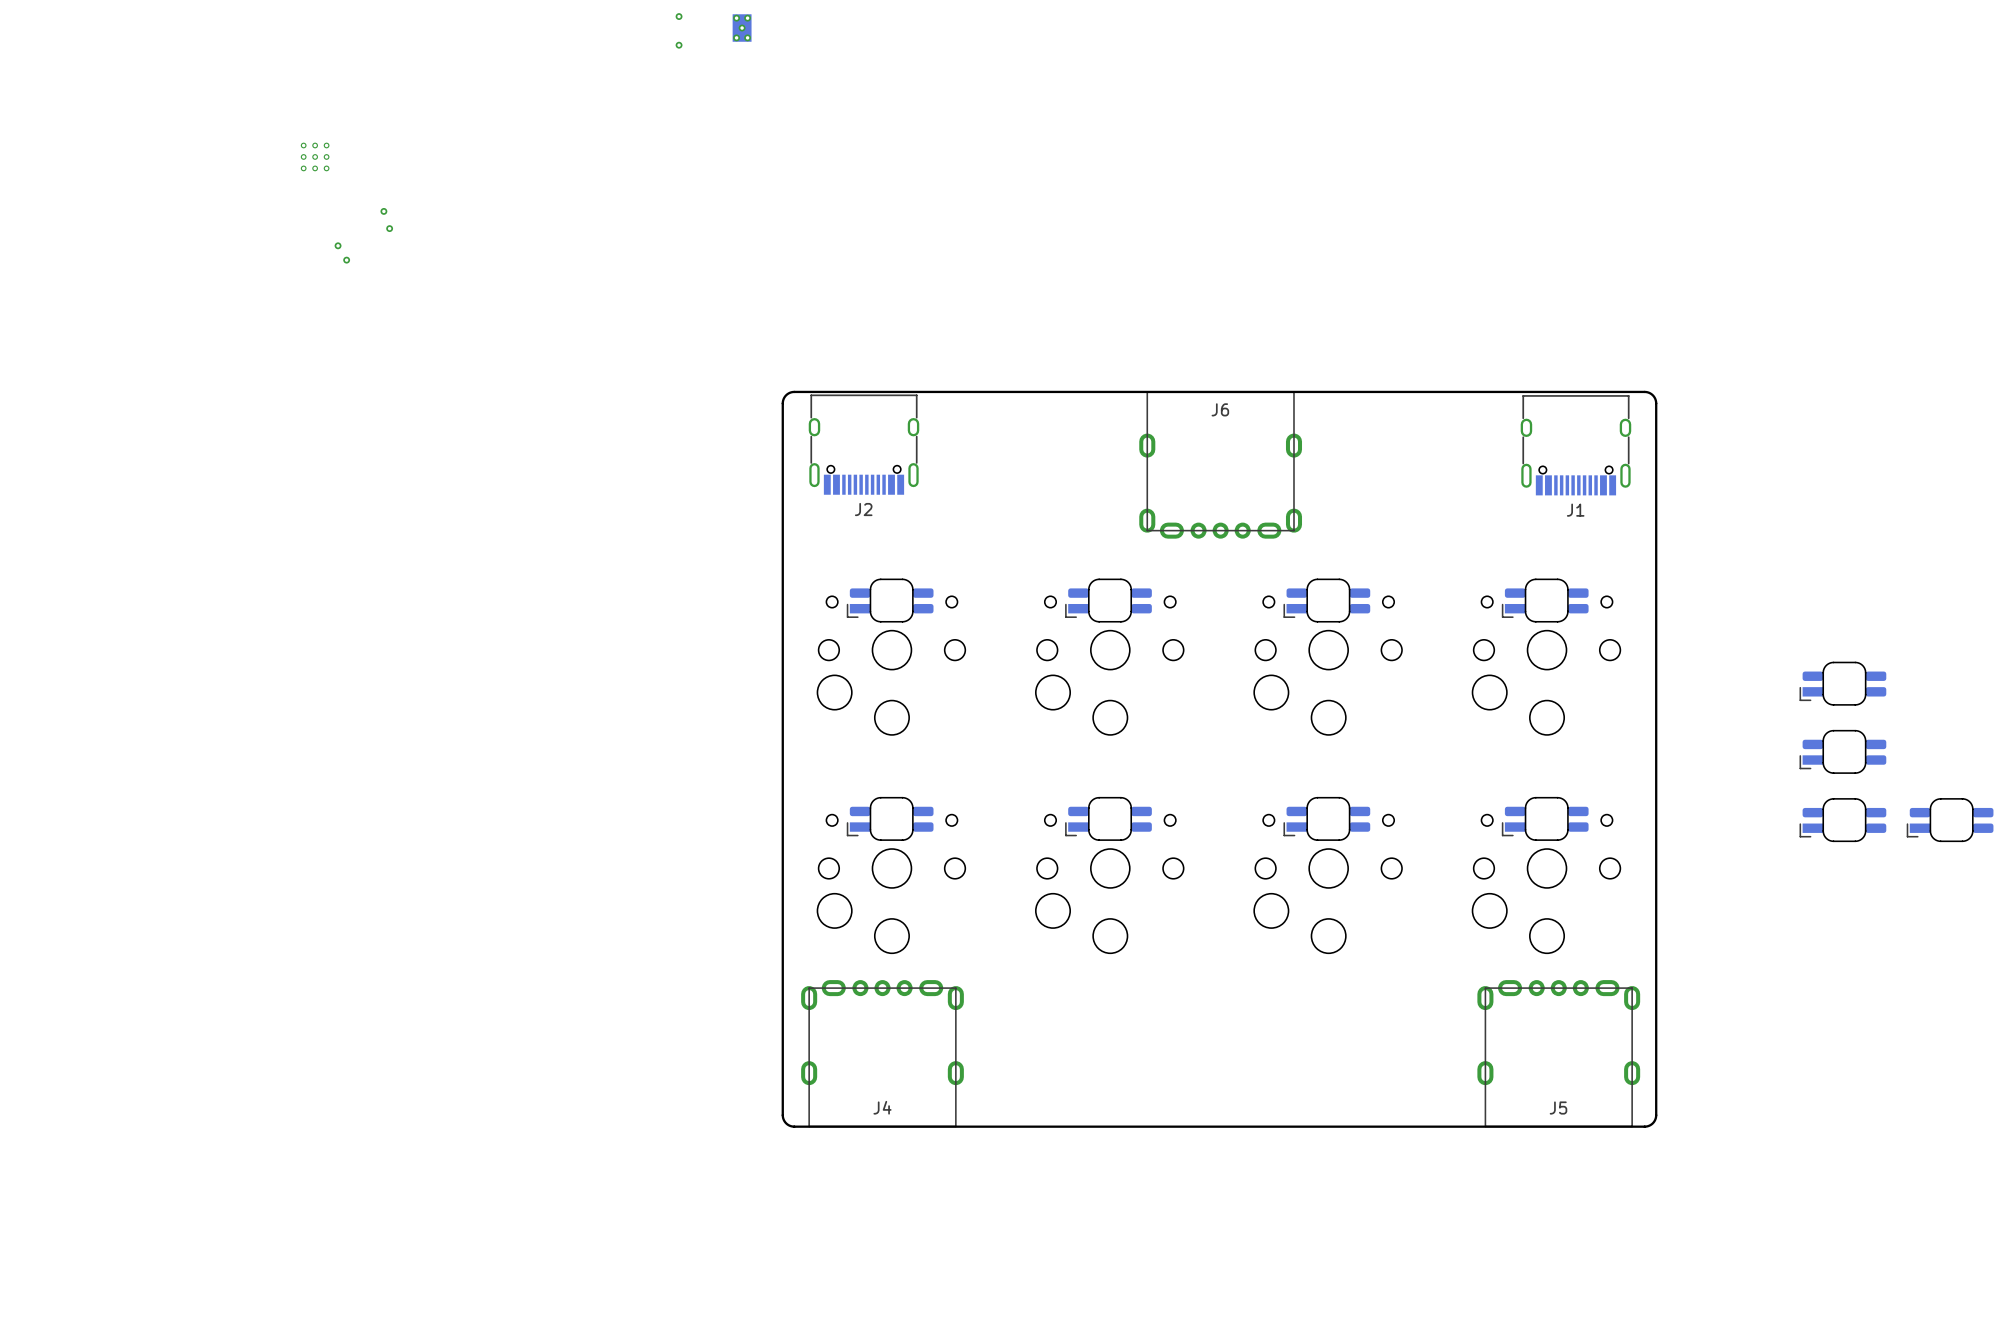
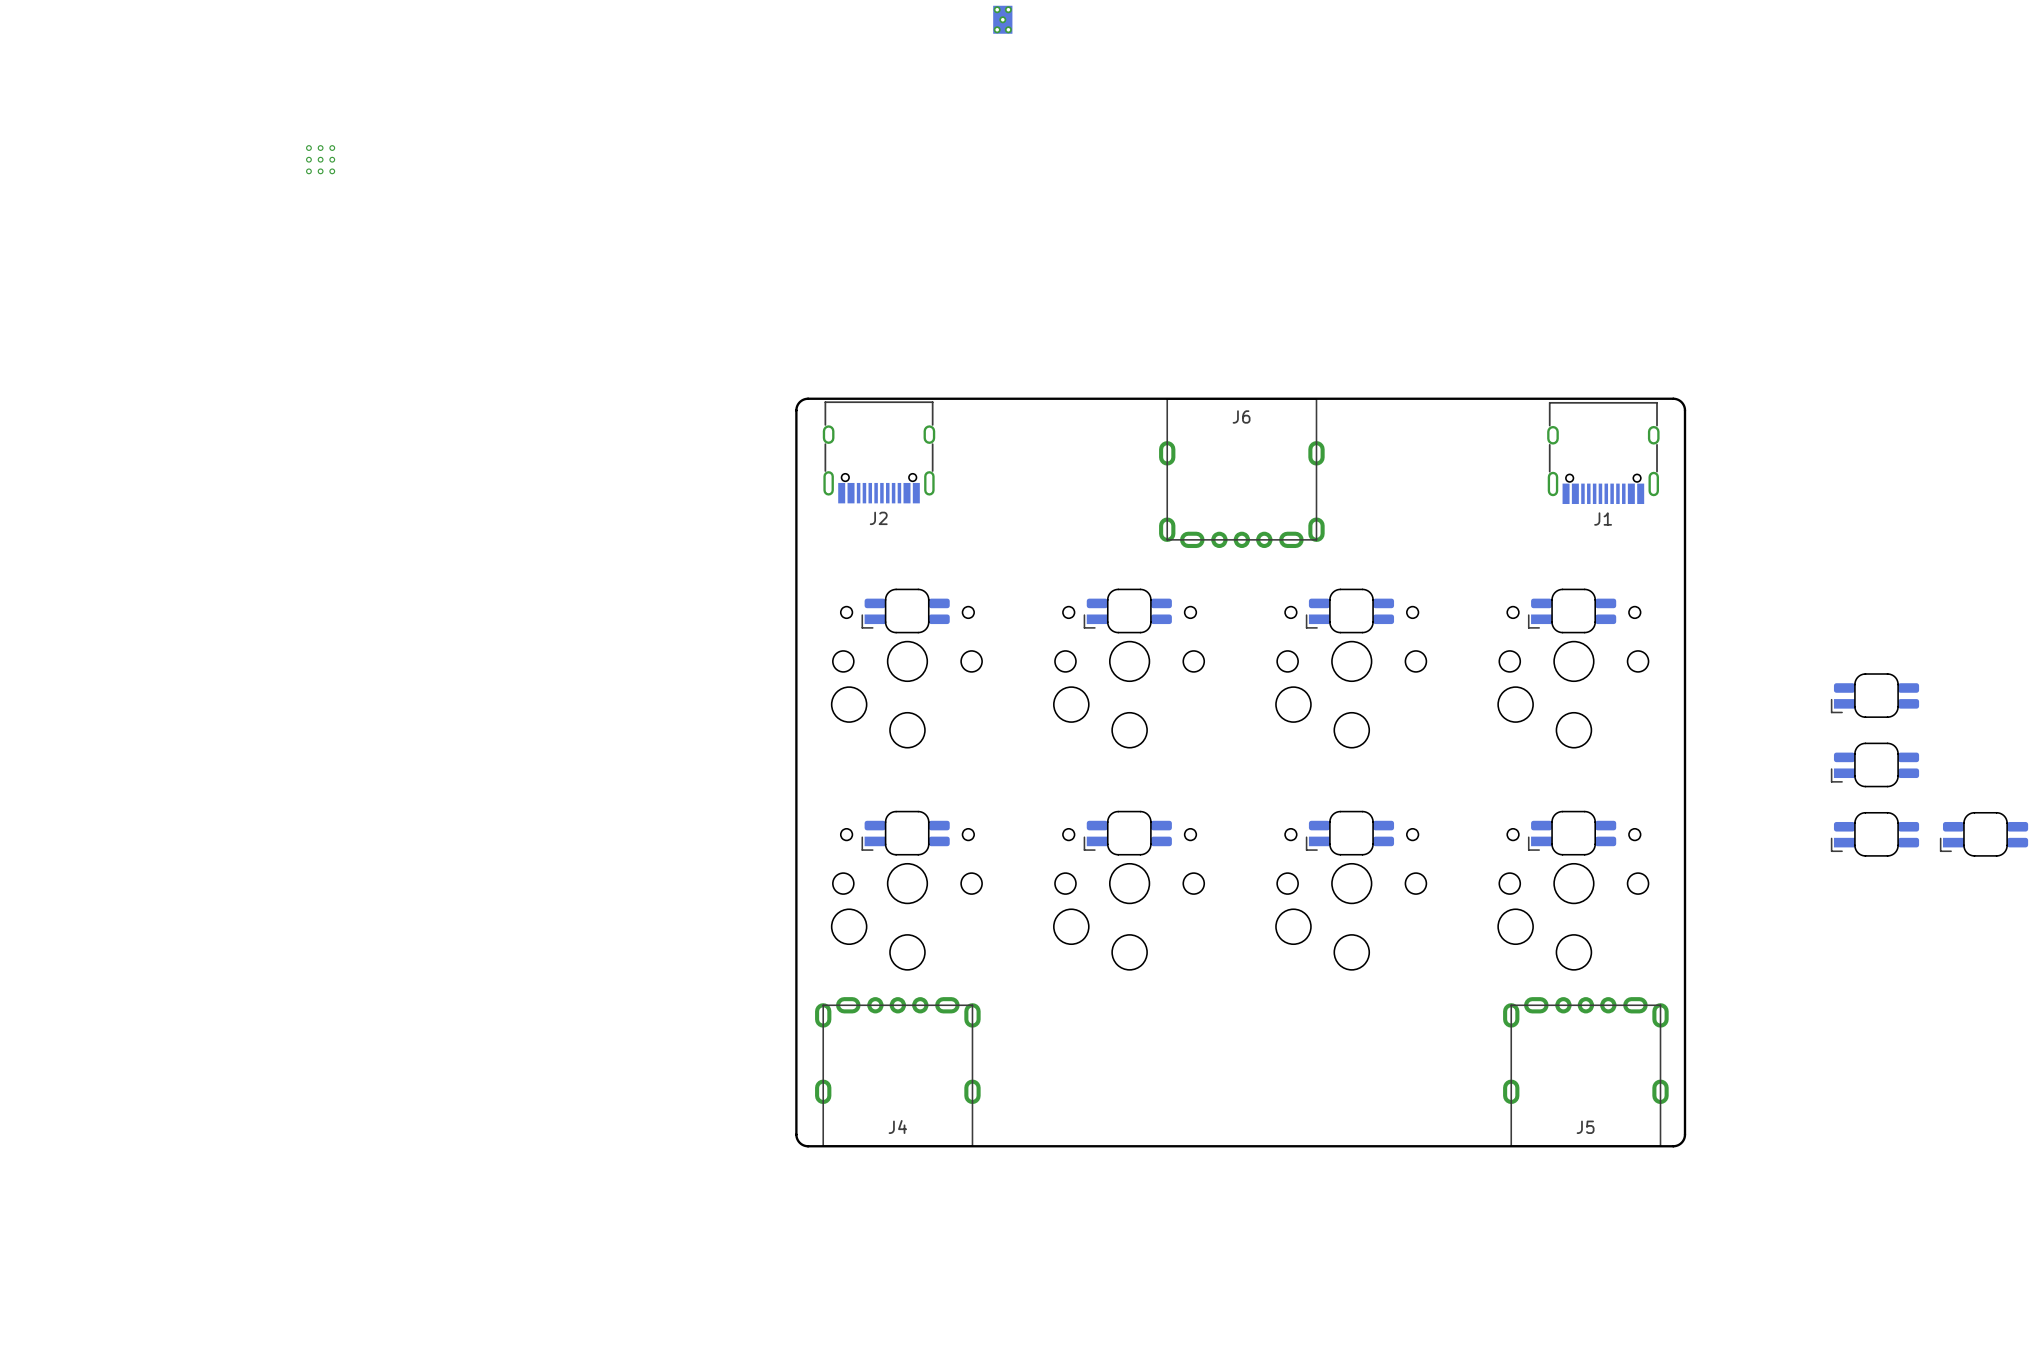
via: (679, 16) -> none
part position: (742, 28) -> (1002, 19)
via: (679, 45) -> none
via: (383, 211) -> none
via: (389, 228) -> none
via: (338, 245) -> none
via: (346, 260) -> none

